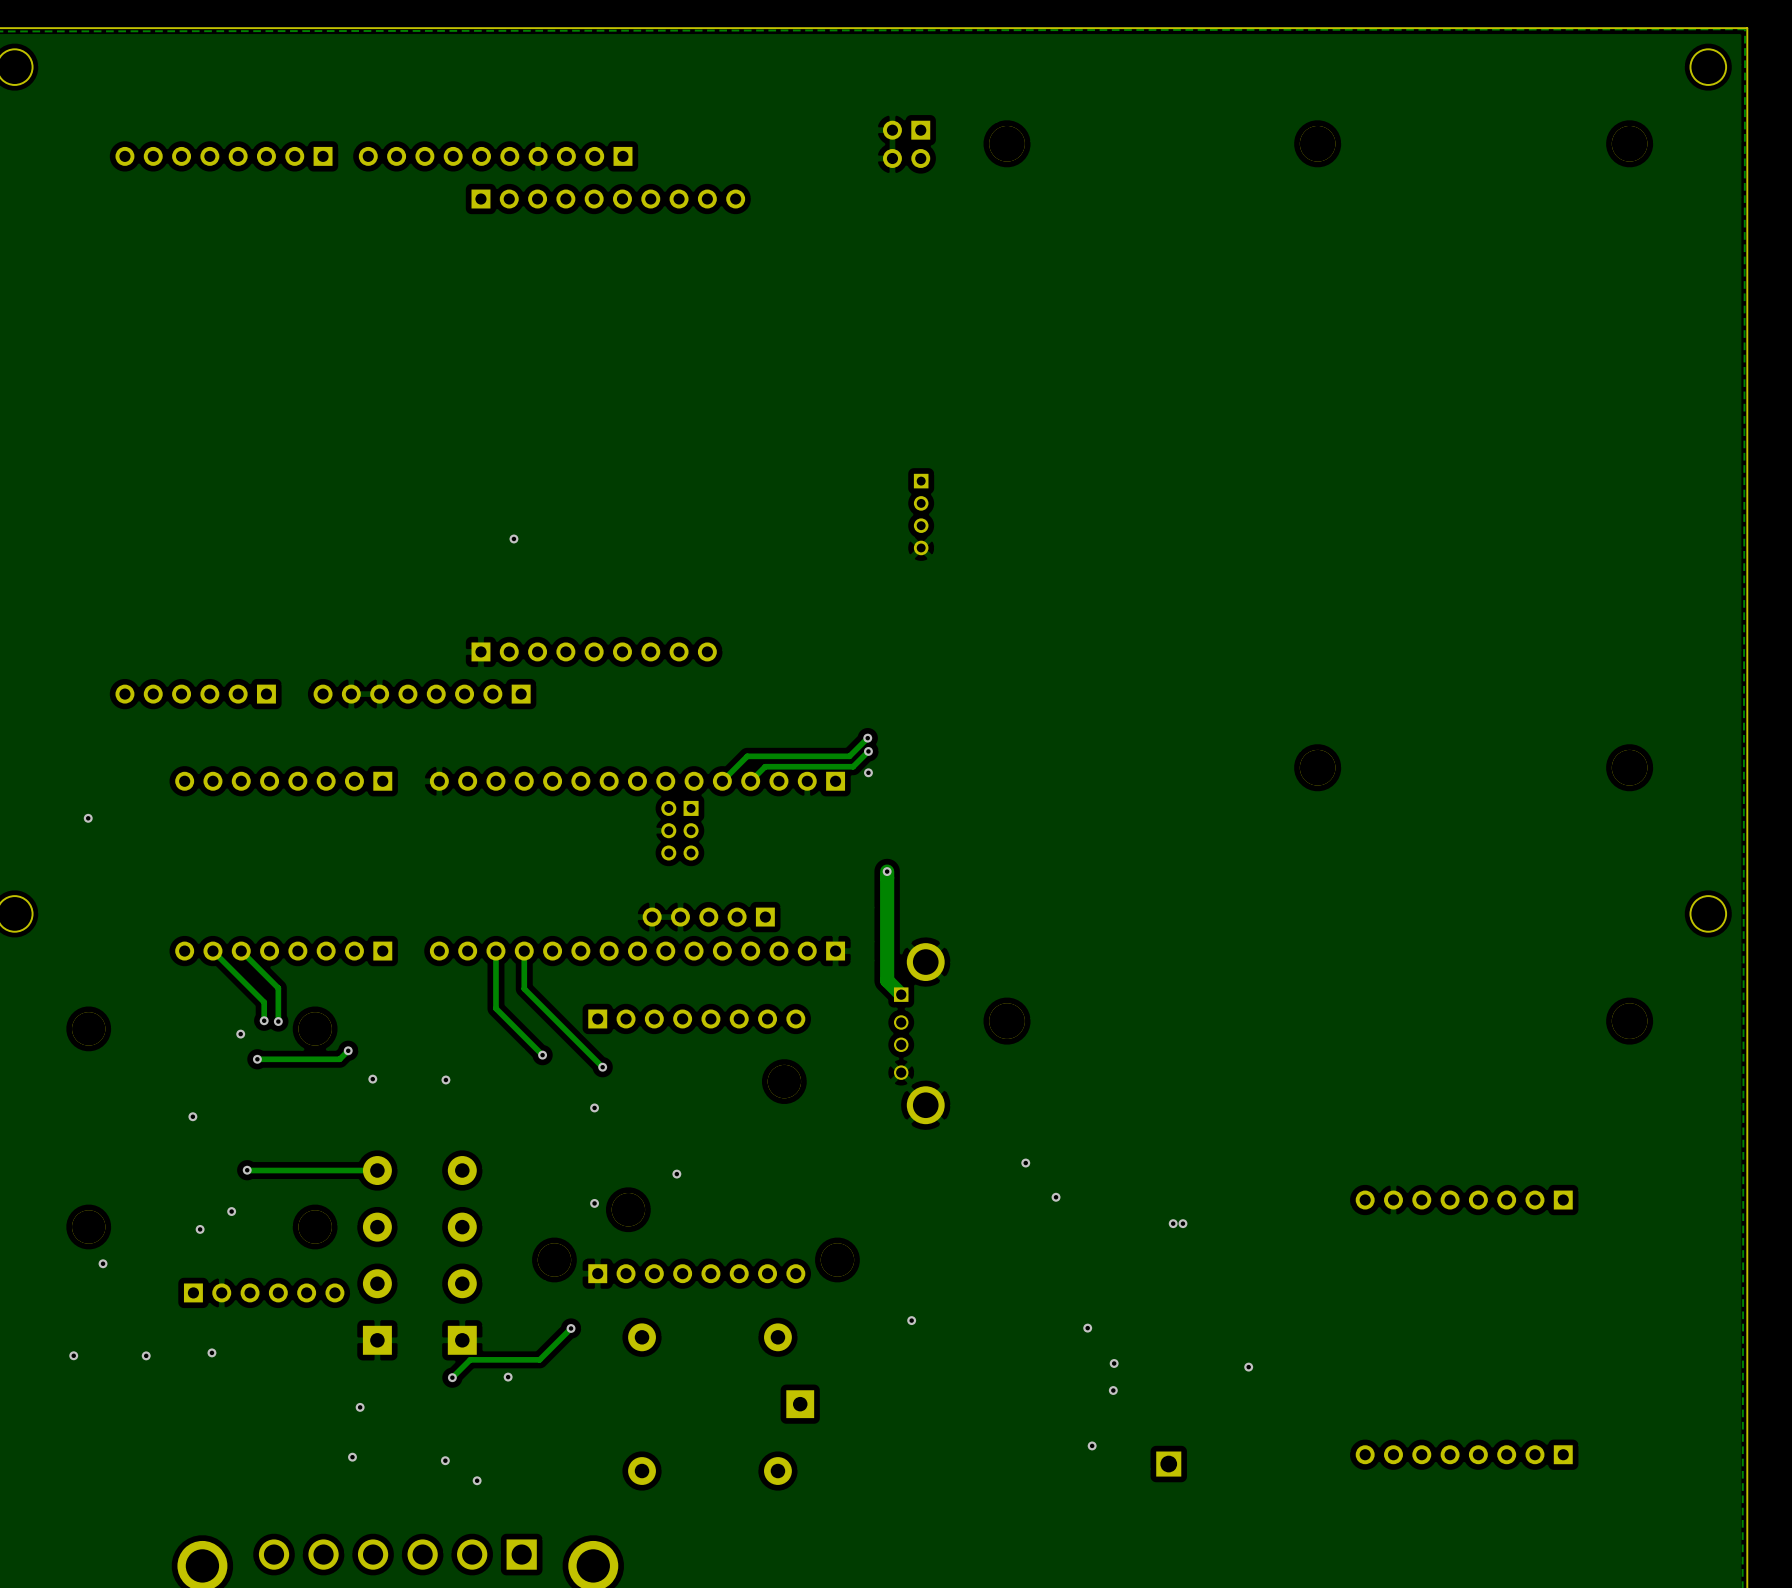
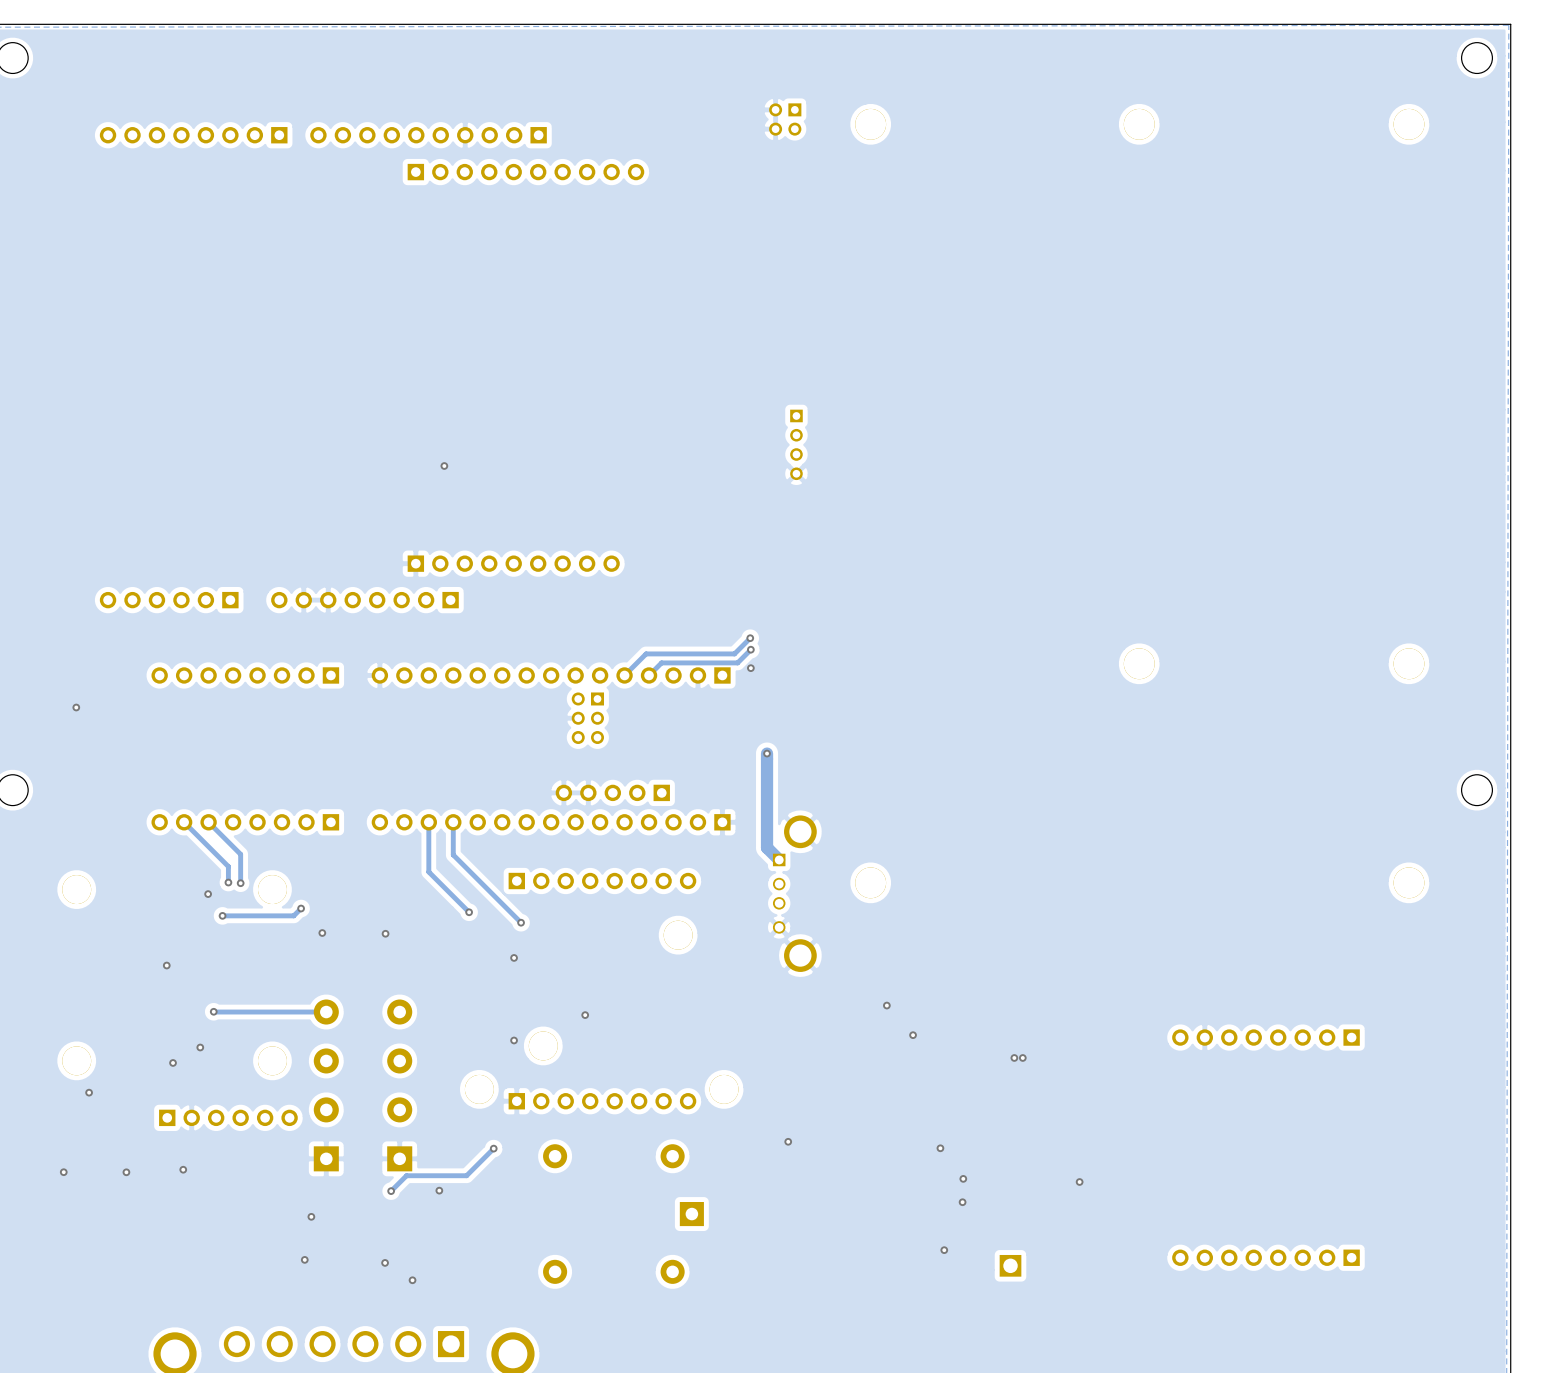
part footprint: [882, 120, 931, 168] -> [769, 103, 802, 136]

